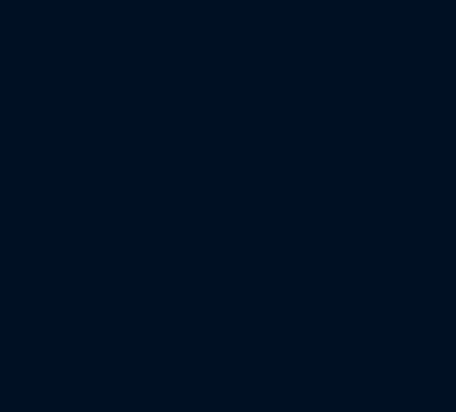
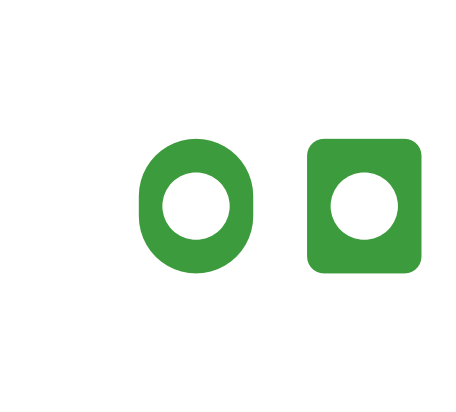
part: none -> (280, 206)

